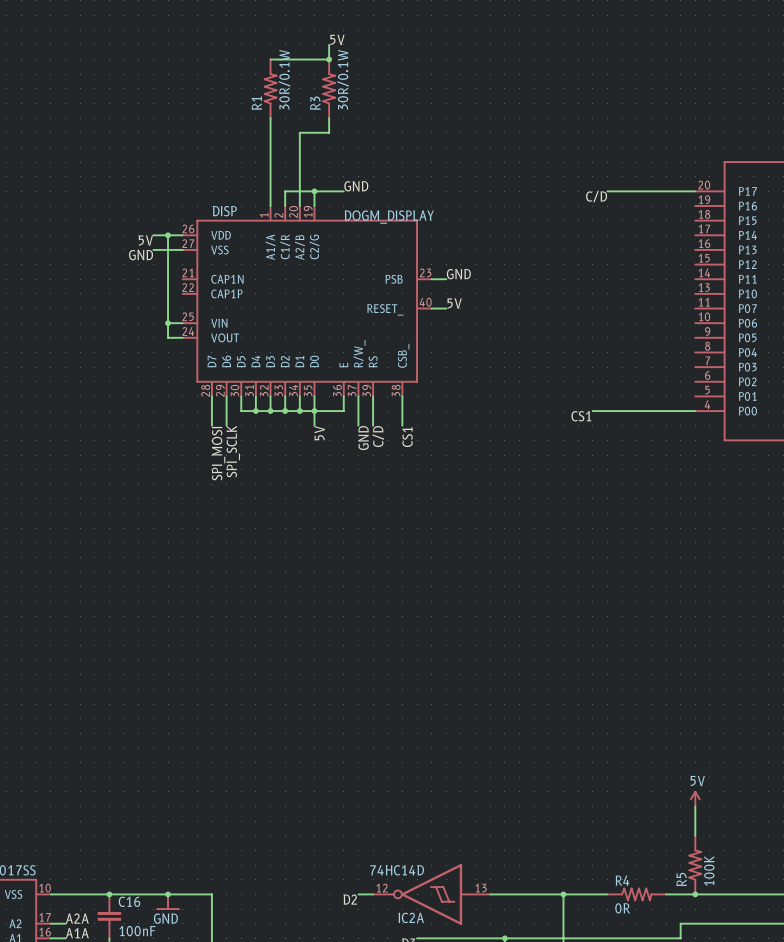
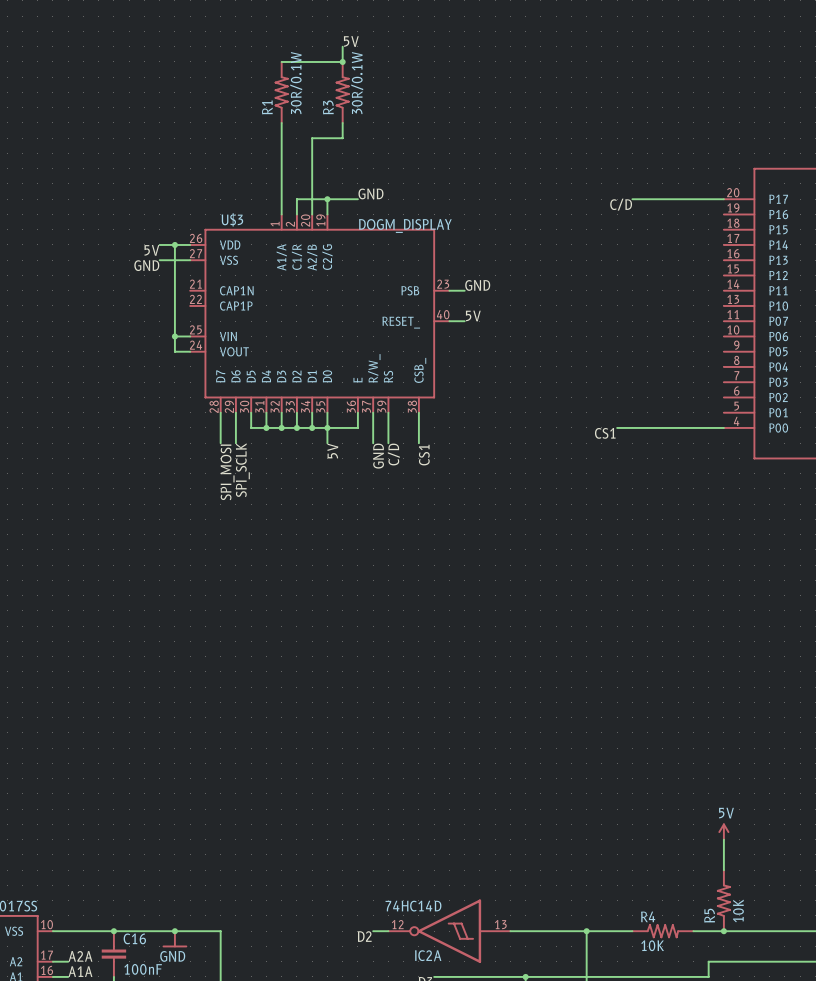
DISP name: DISP (224, 211) -> U$3 (232, 219)
R5 value: 100K (709, 871) -> 10K (738, 910)
R4 value: 0R (622, 908) -> 10K (652, 945)

